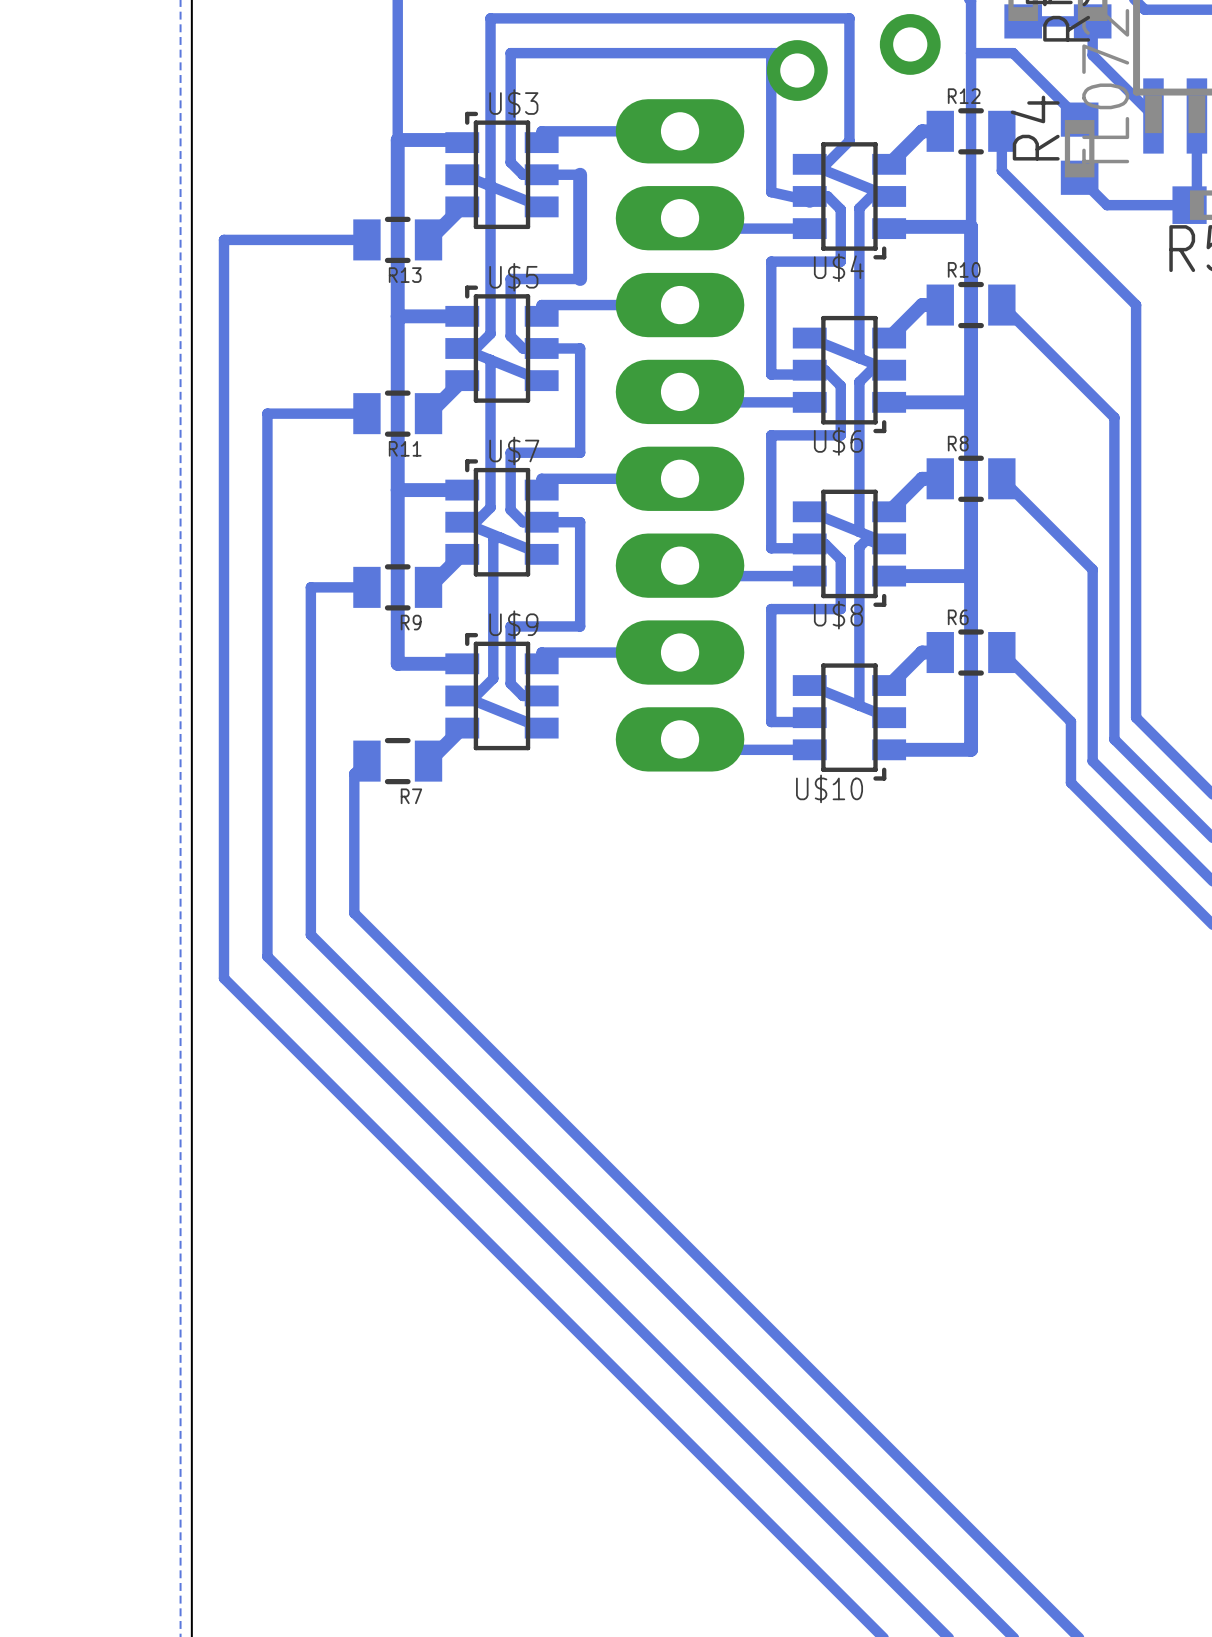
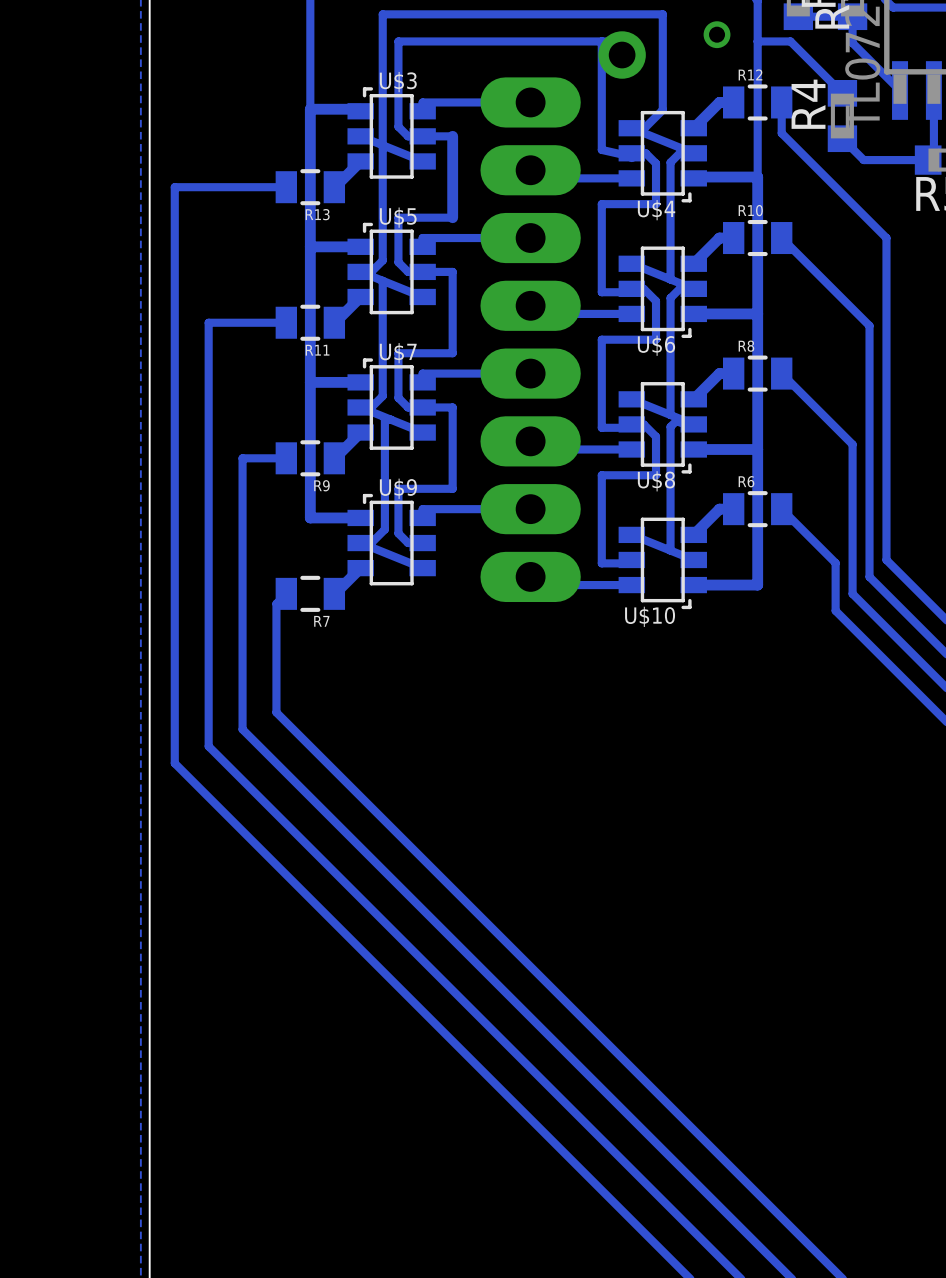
via size: [879, 14, 941, 75] -> [703, 21, 731, 49]

